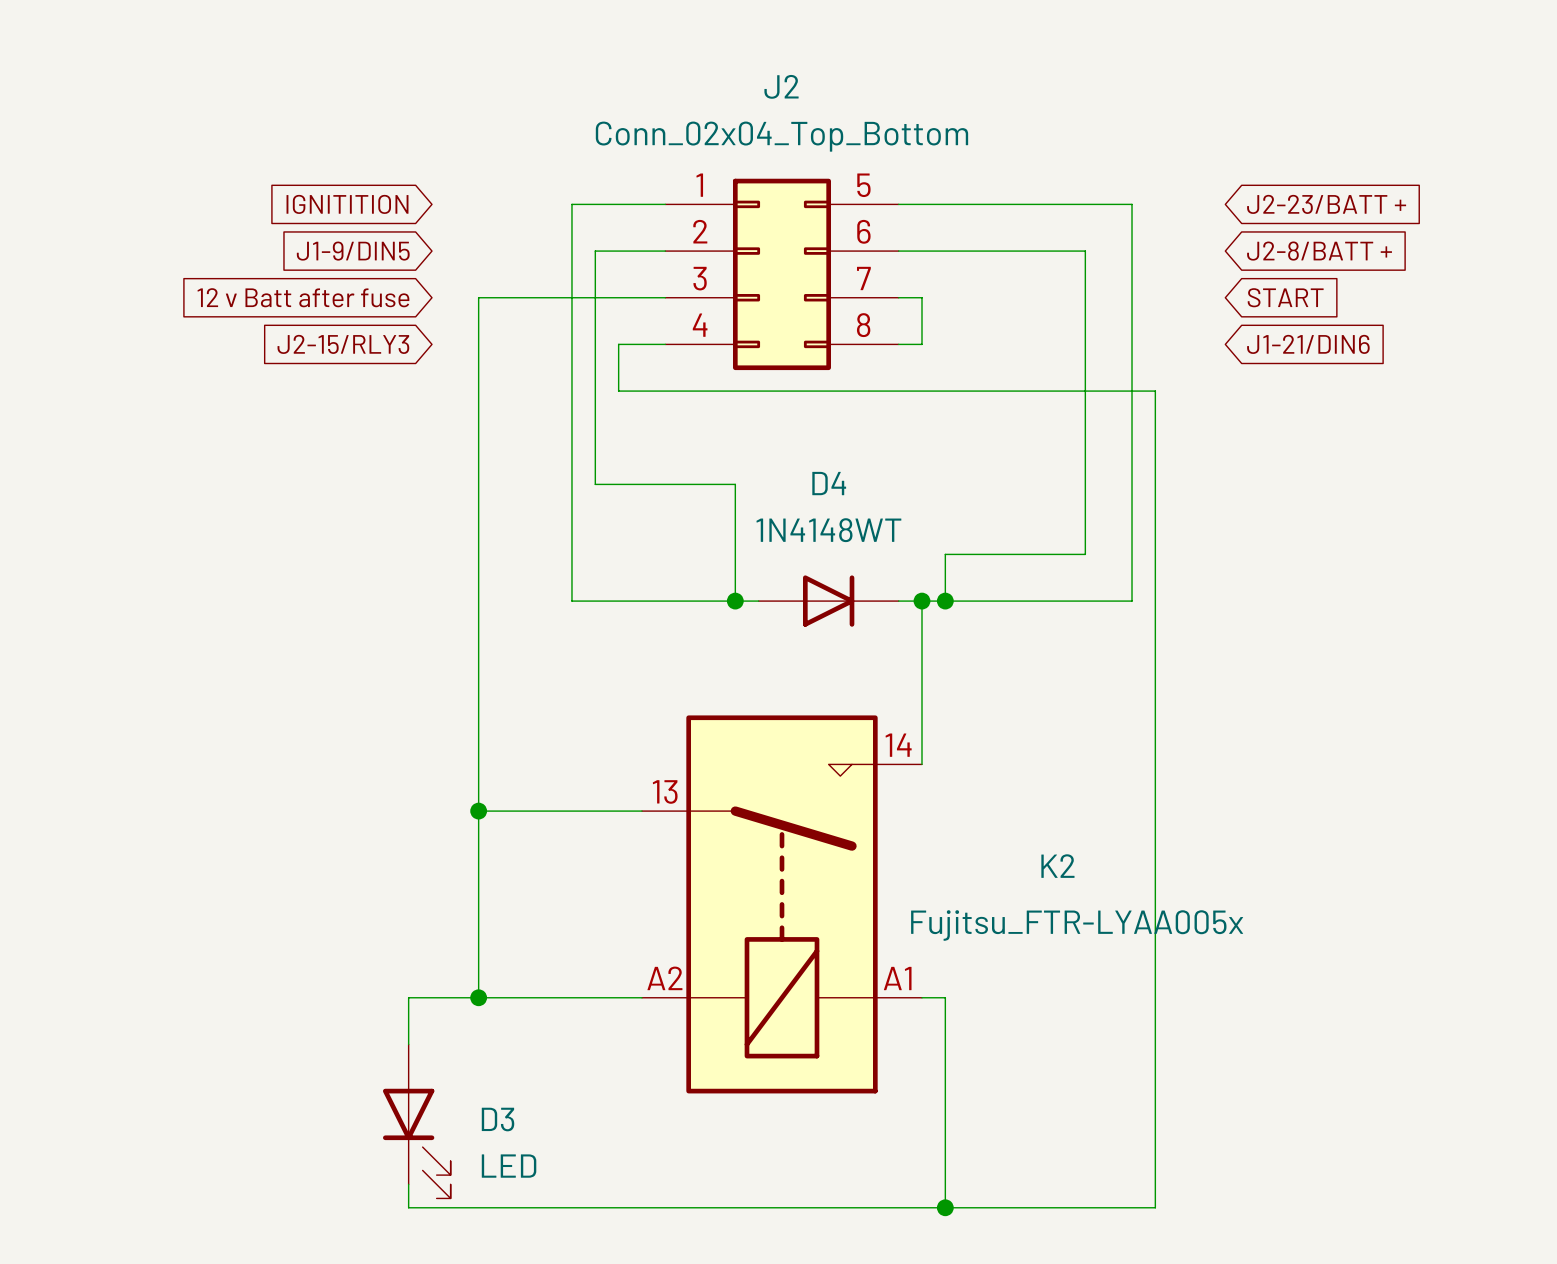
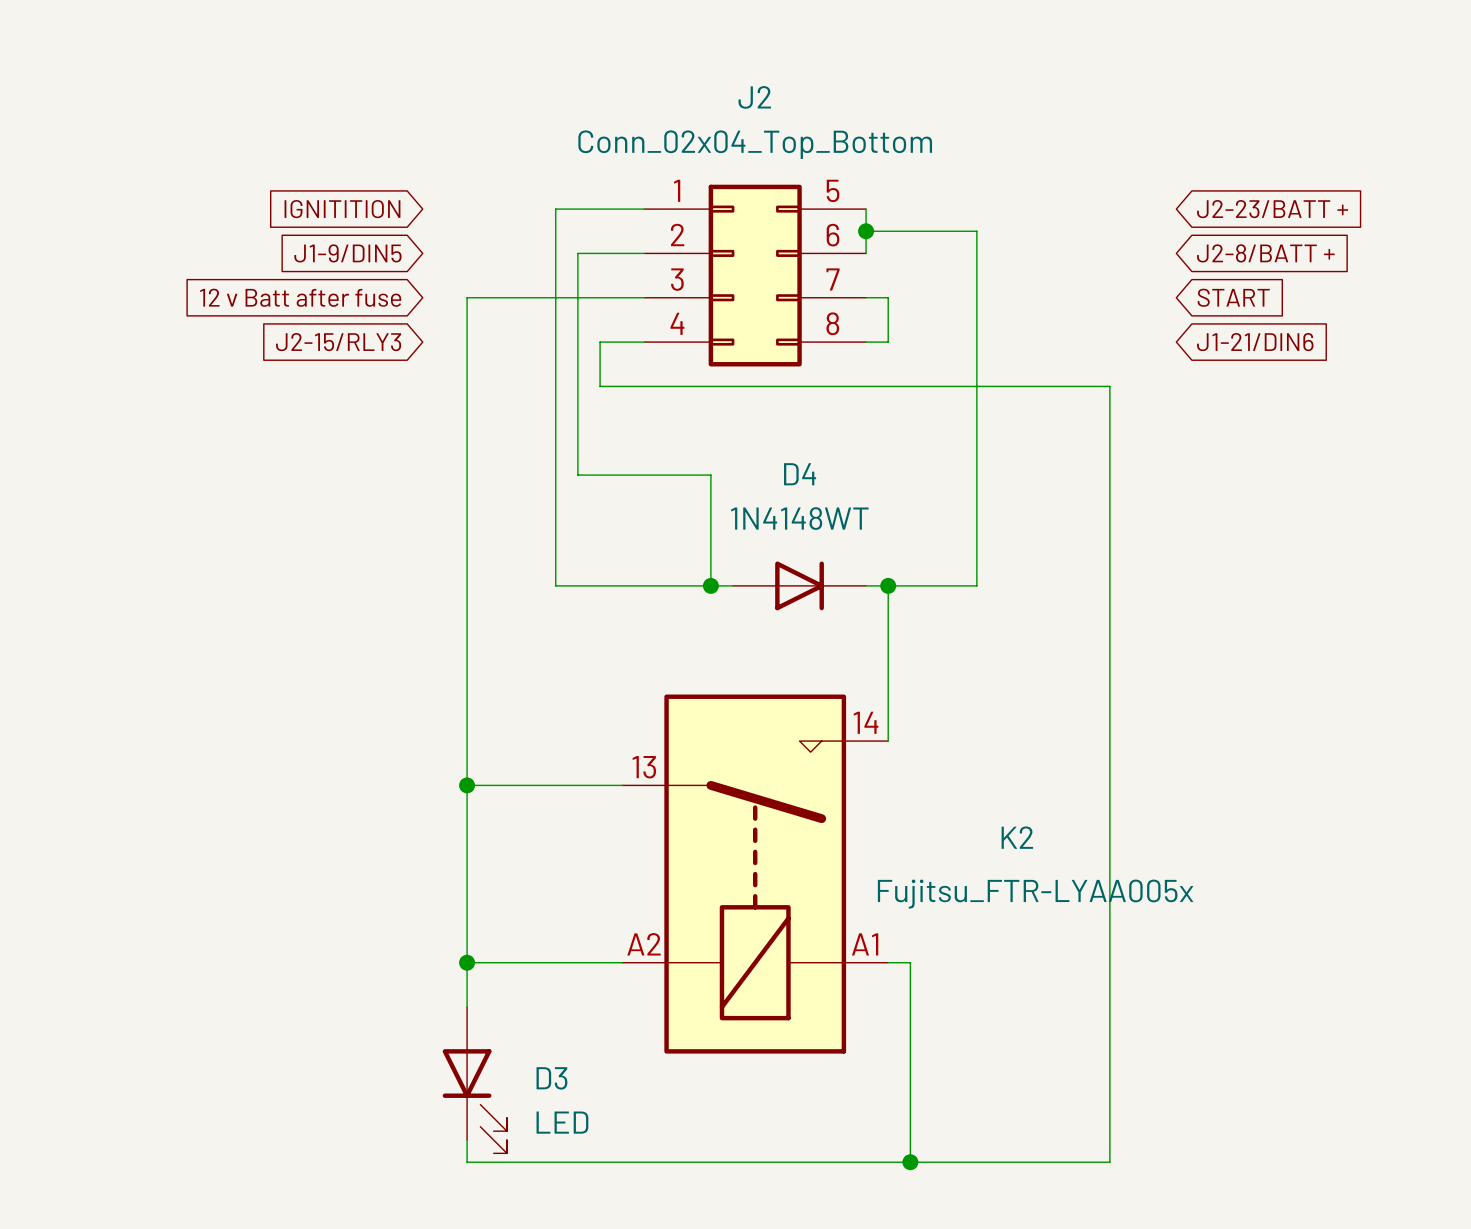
wire: (898, 204) (1132, 204) (1132, 601) (1015, 601) -> (866, 231) (976, 231) (976, 585)
junction: none -> (866, 231)
wire: (898, 251) (1085, 251) (1085, 554) (945, 554) (945, 601) -> (866, 253) (866, 209)
junction: (945, 601) -> none
wire: (478, 997) (408, 997) (408, 1044) -> (467, 962) (467, 1007)
D3 position: (416, 1121) -> (474, 1080)
wire: (408, 1184) (408, 1207) (478, 1207) -> (467, 1140) (467, 1162)

